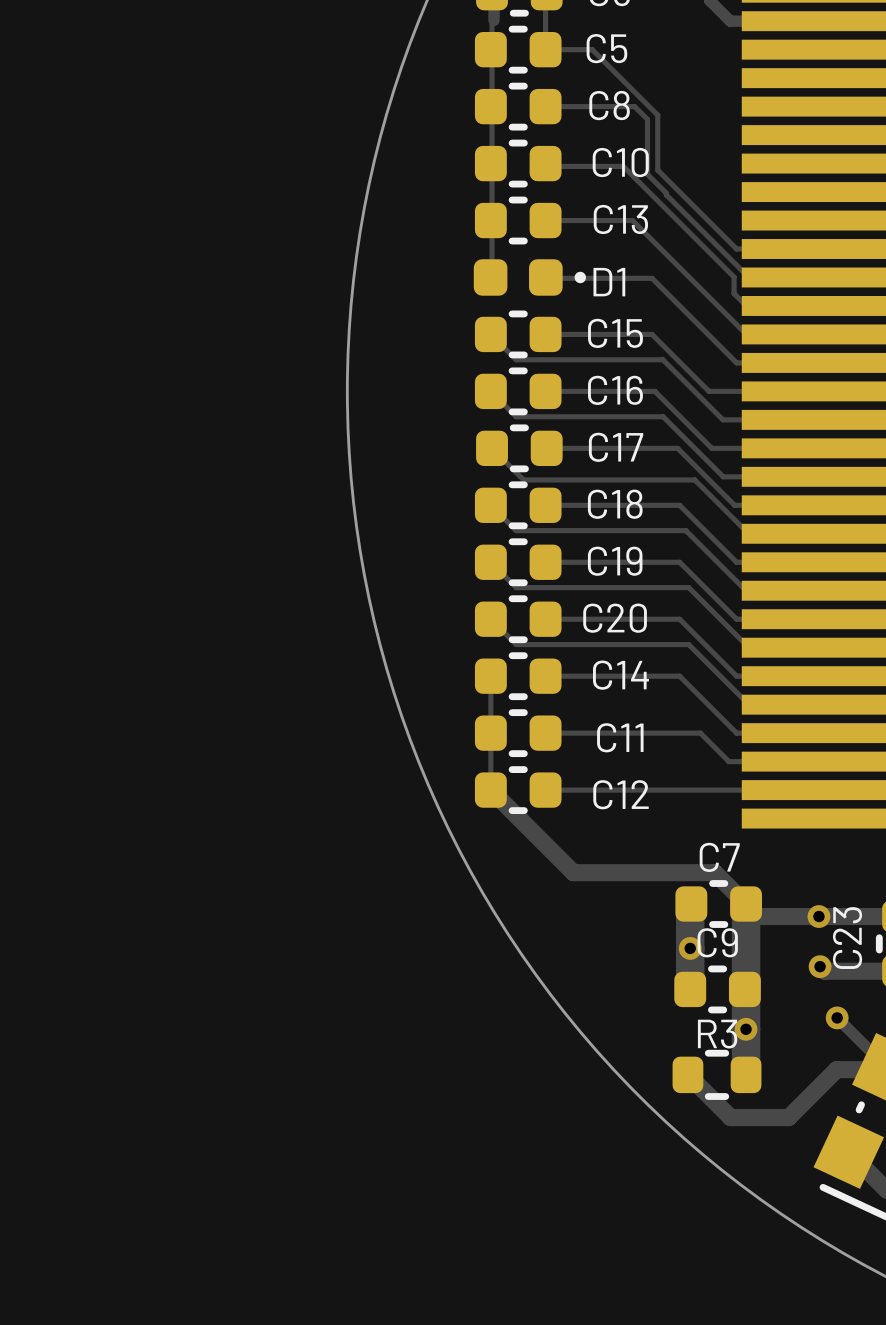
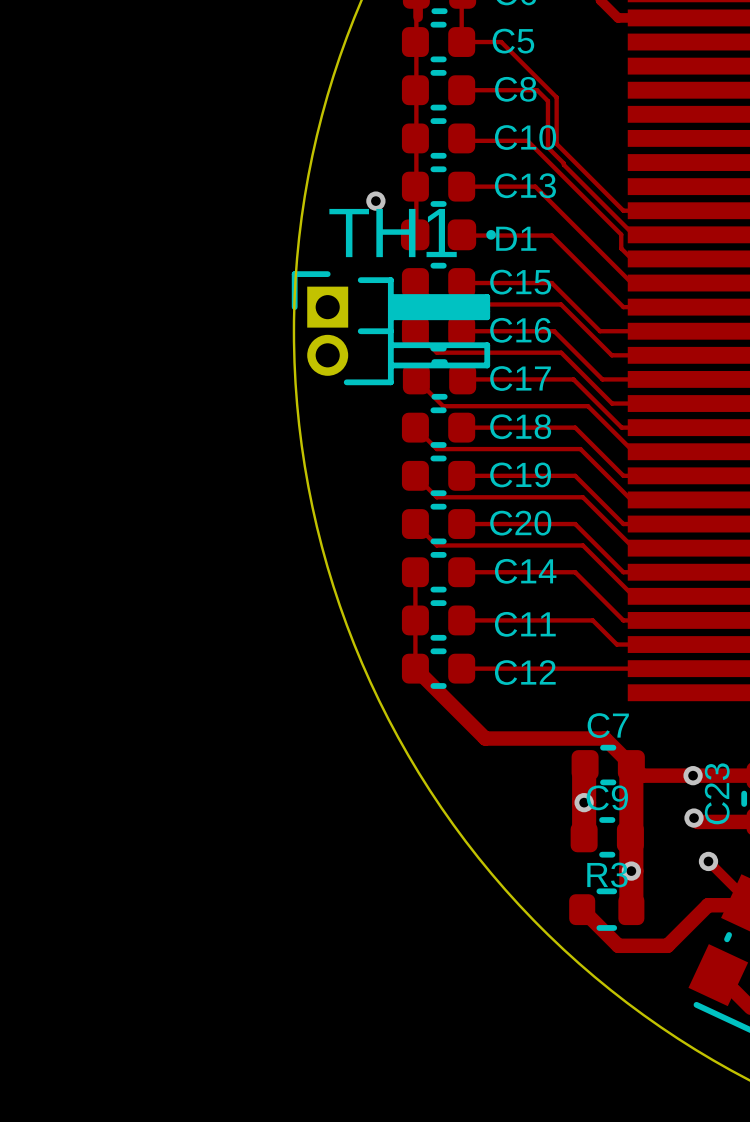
via: none -> (375, 201)
TH1: none -> (390, 328)

